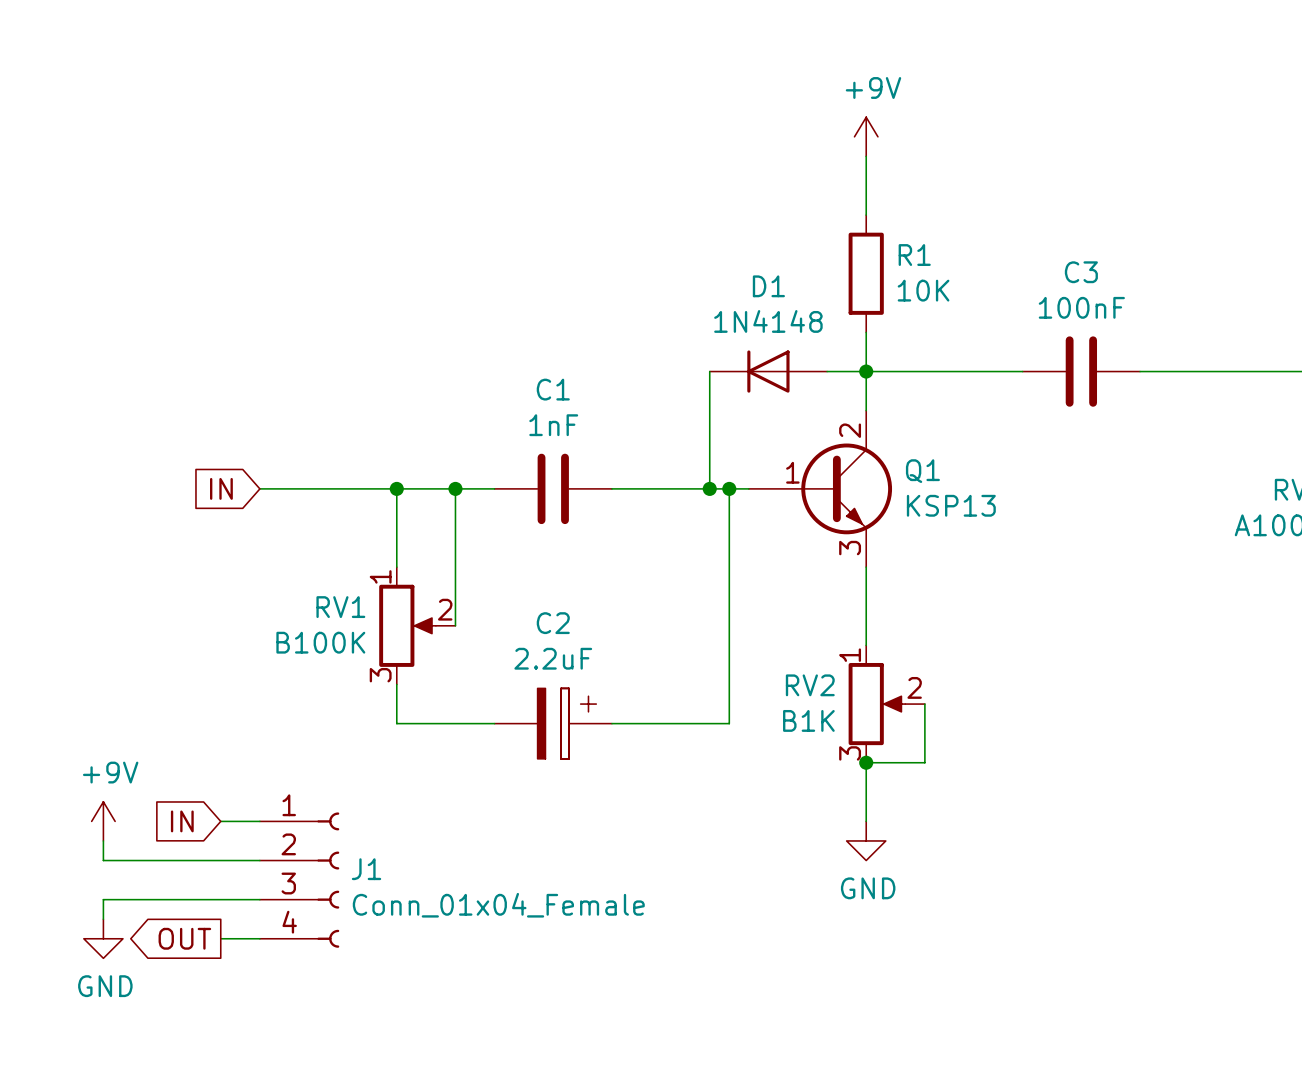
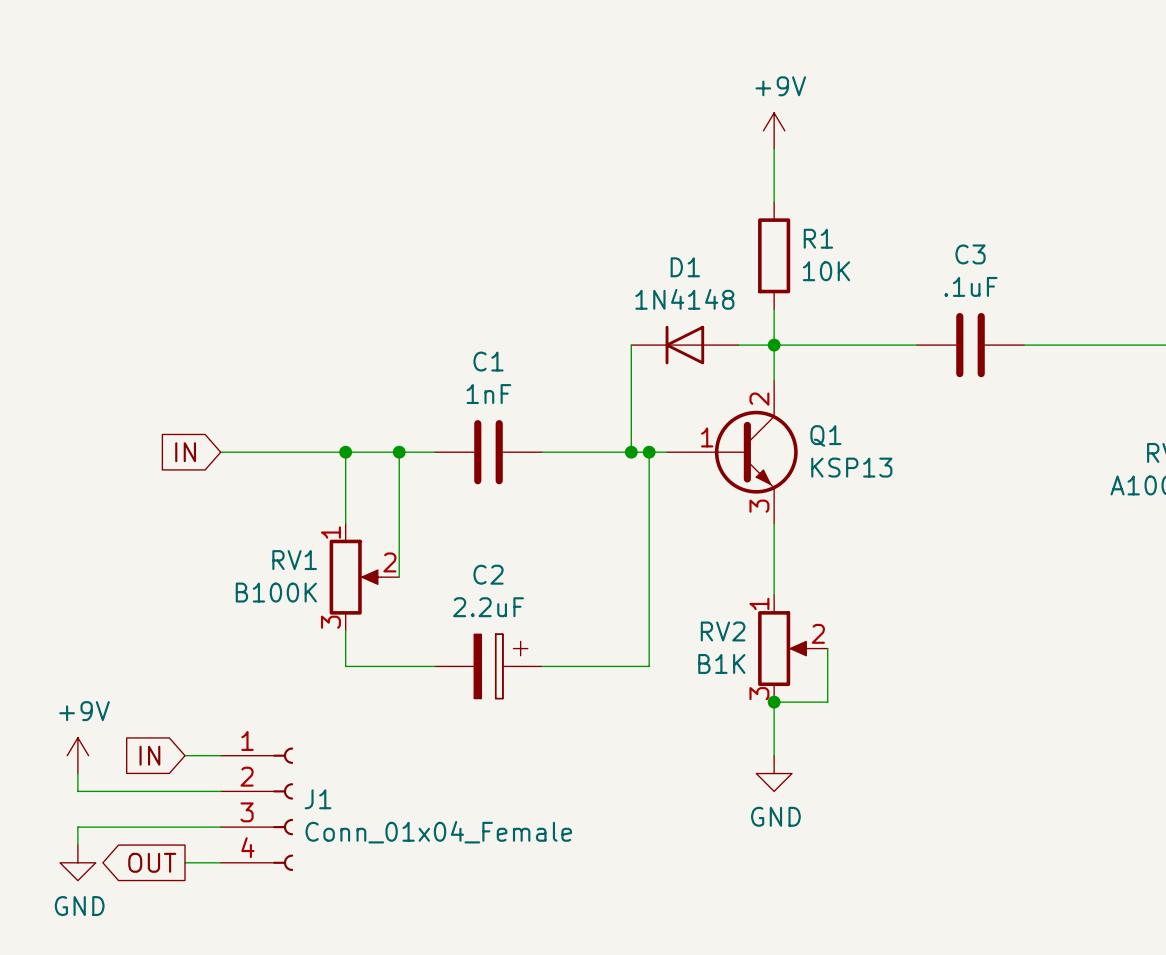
C3 value: 100nF (1081, 307) -> .1uF (970, 286)

